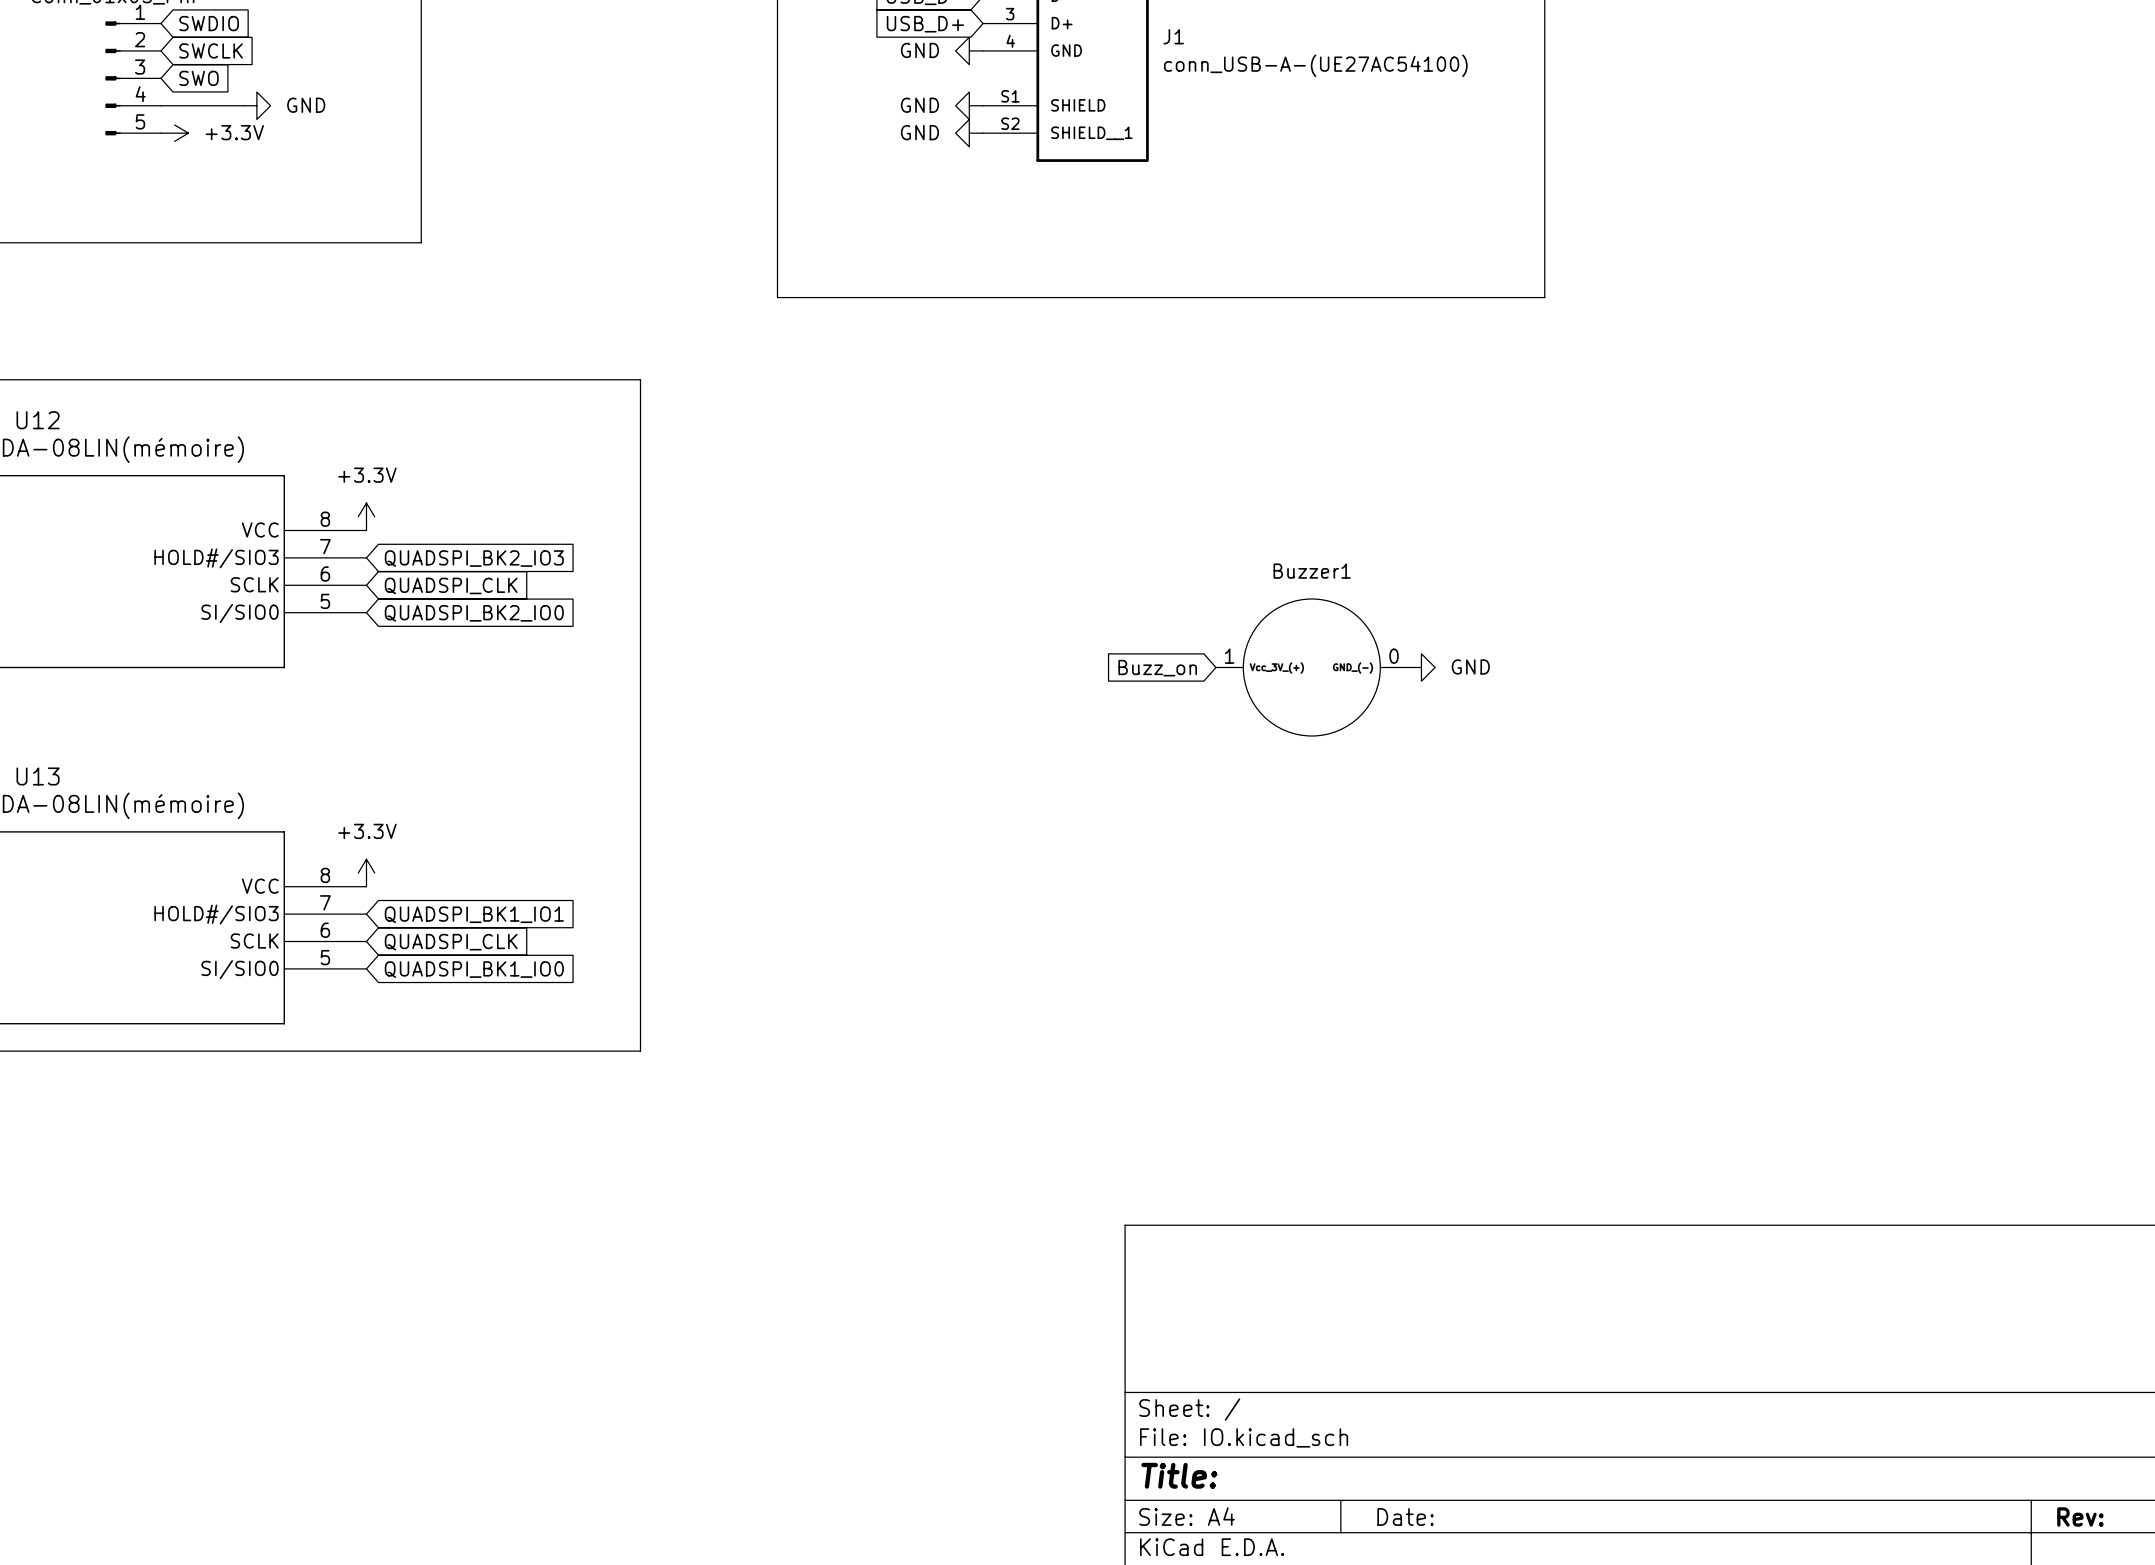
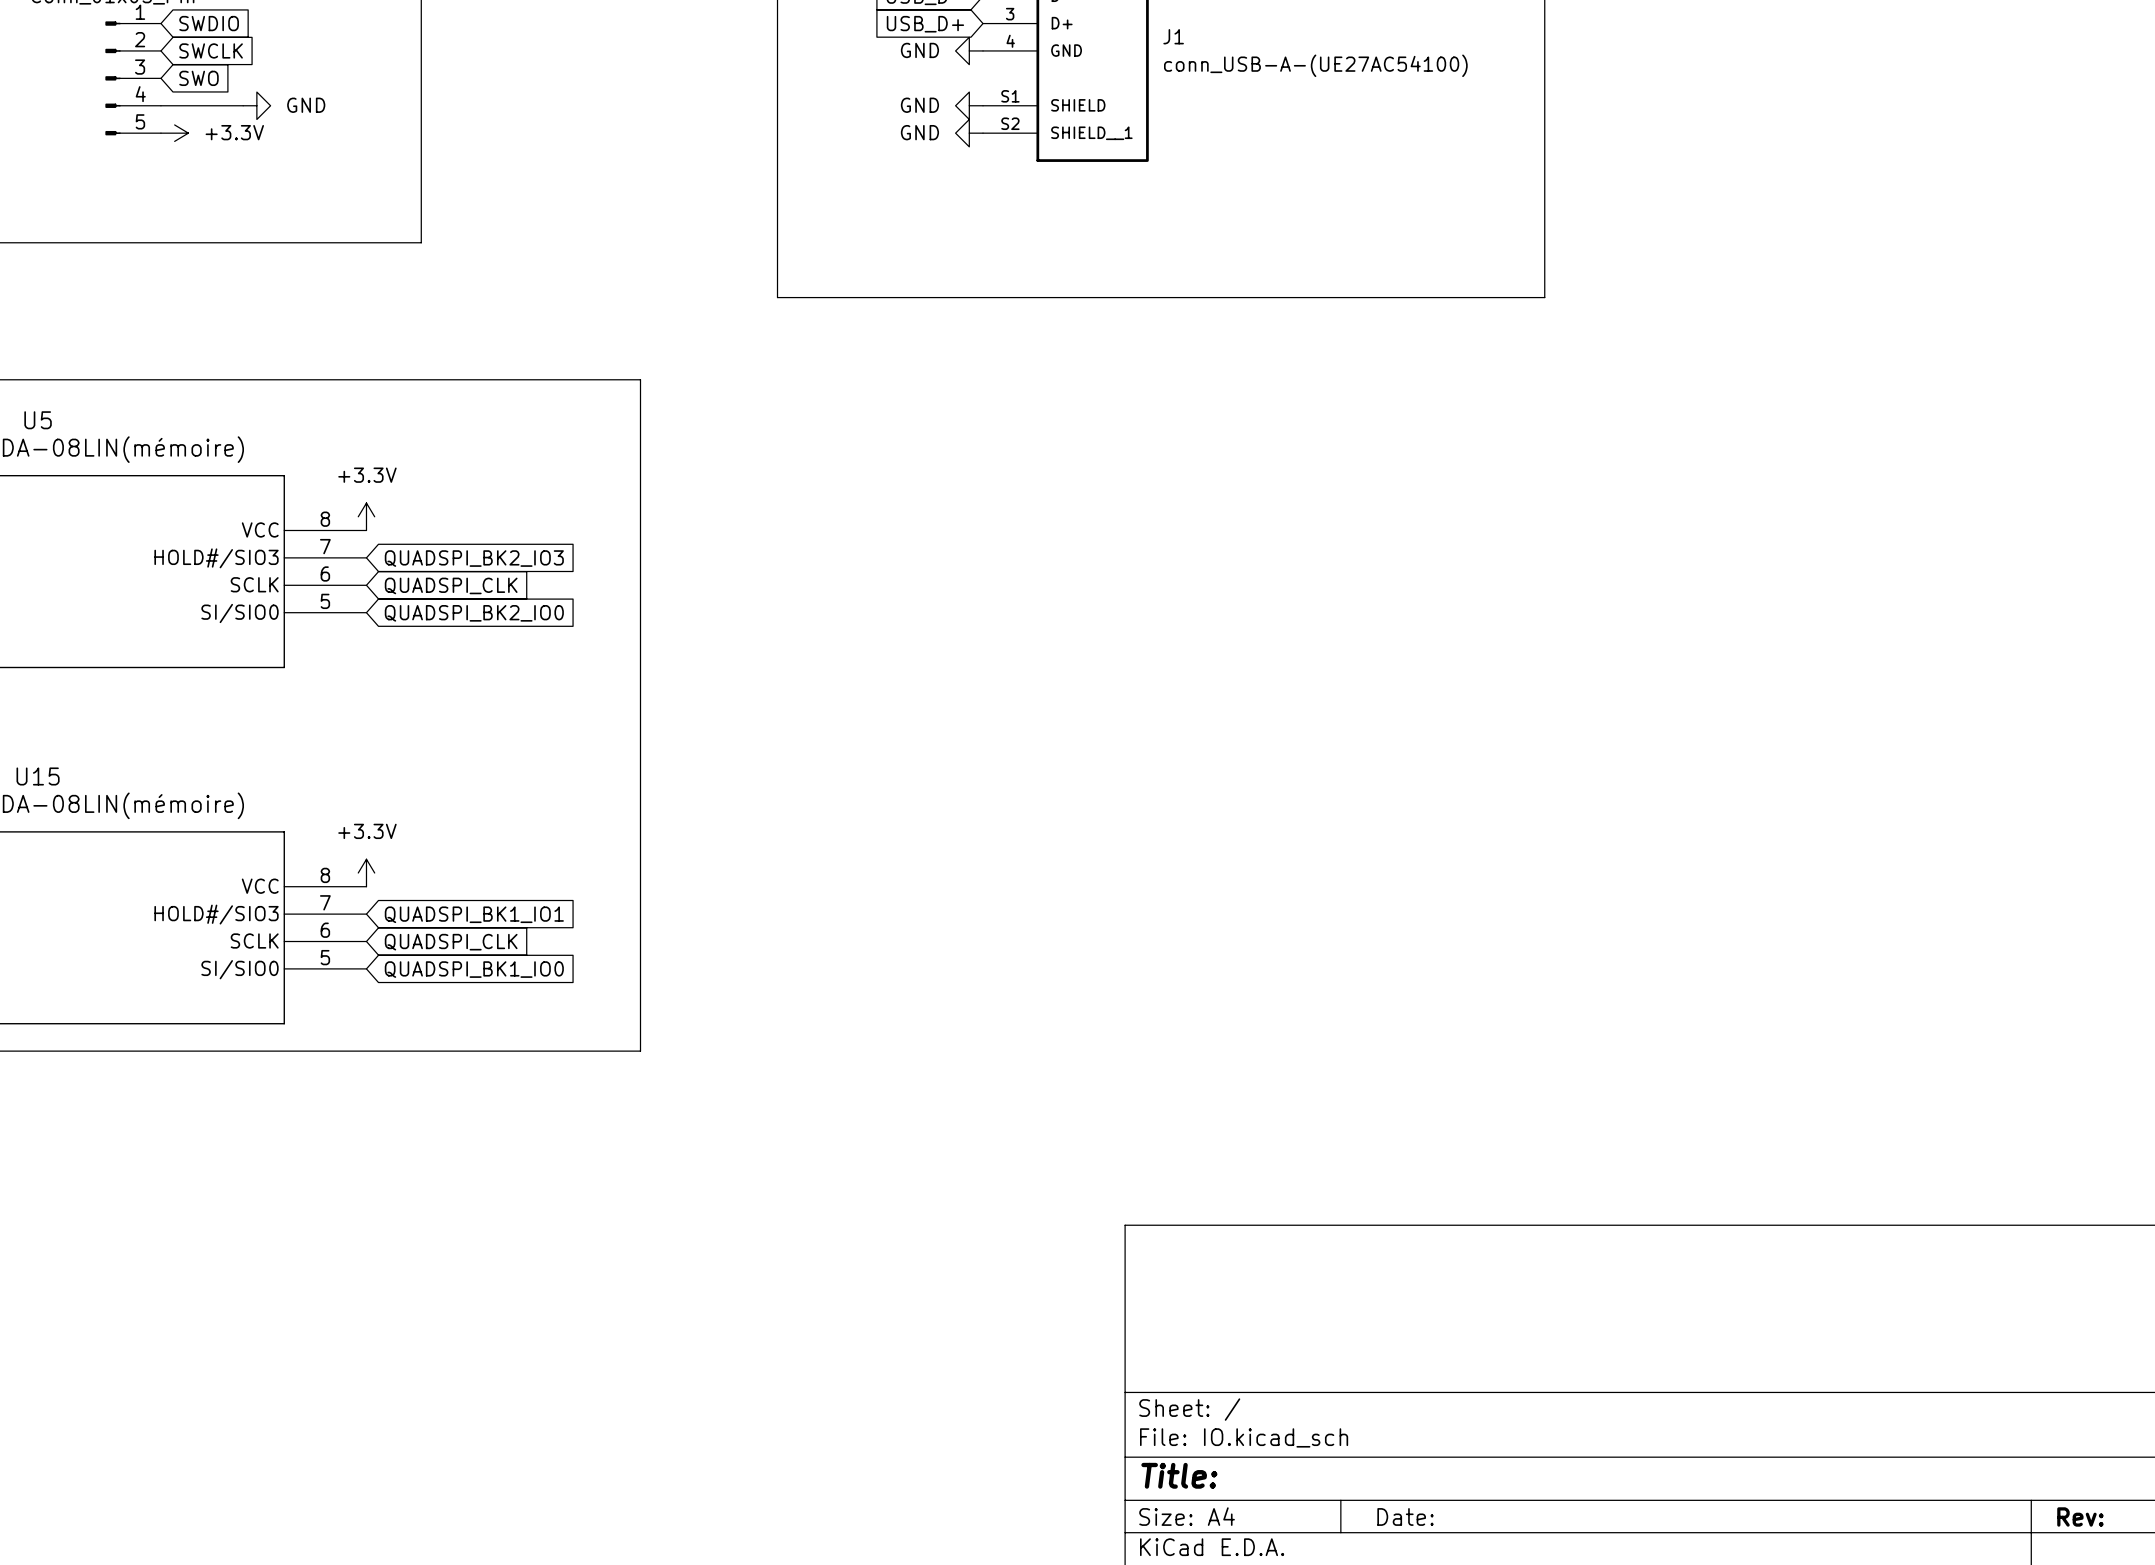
U12 name: U12 (38, 420) -> U5 (38, 420)
Buzzer1: (1311, 667) -> none
power symbol: GND (1421, 667) -> none
global label: Buzz_on (1157, 668) -> none
U13 name: U13 (38, 776) -> U15 (38, 776)

